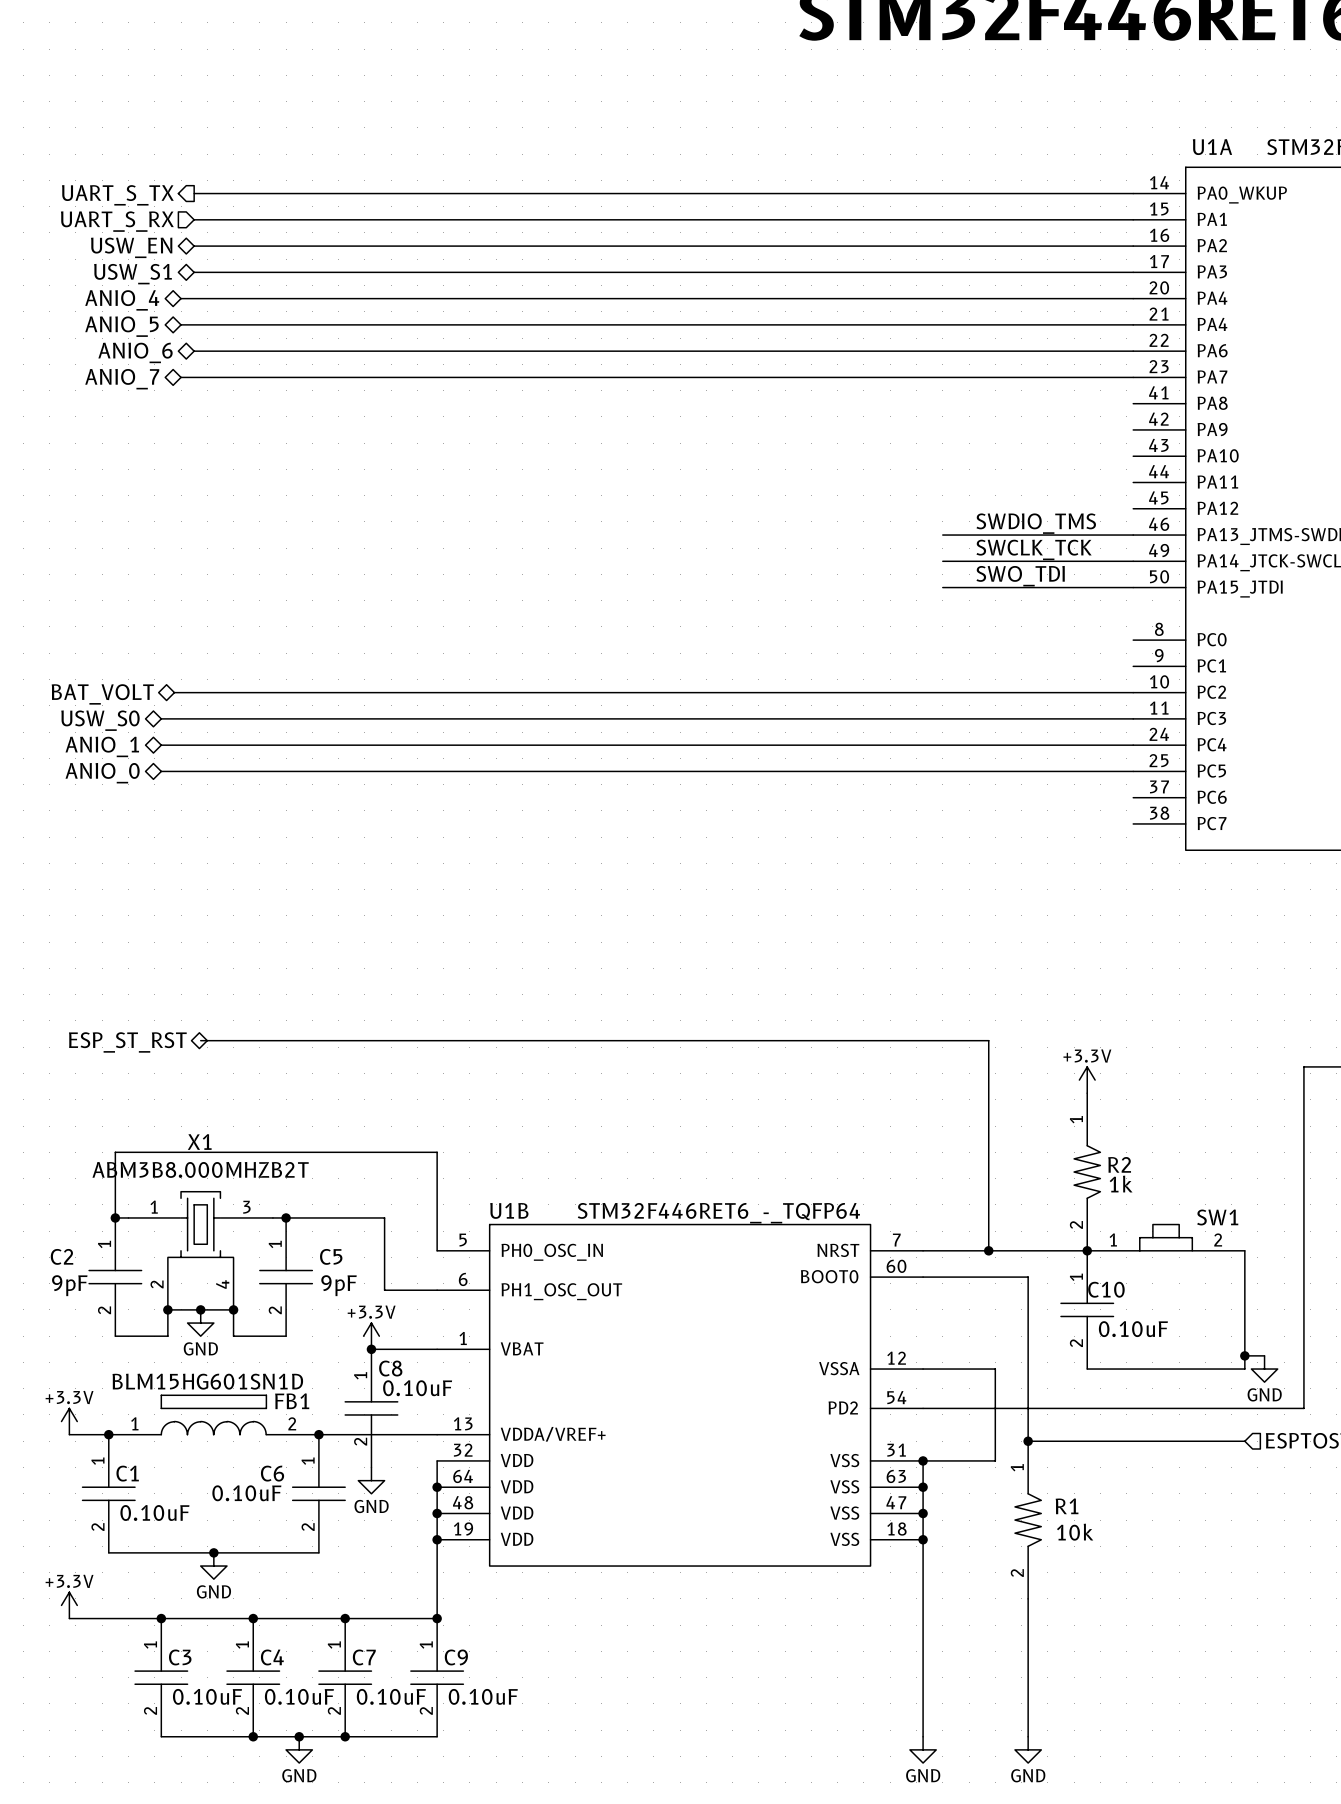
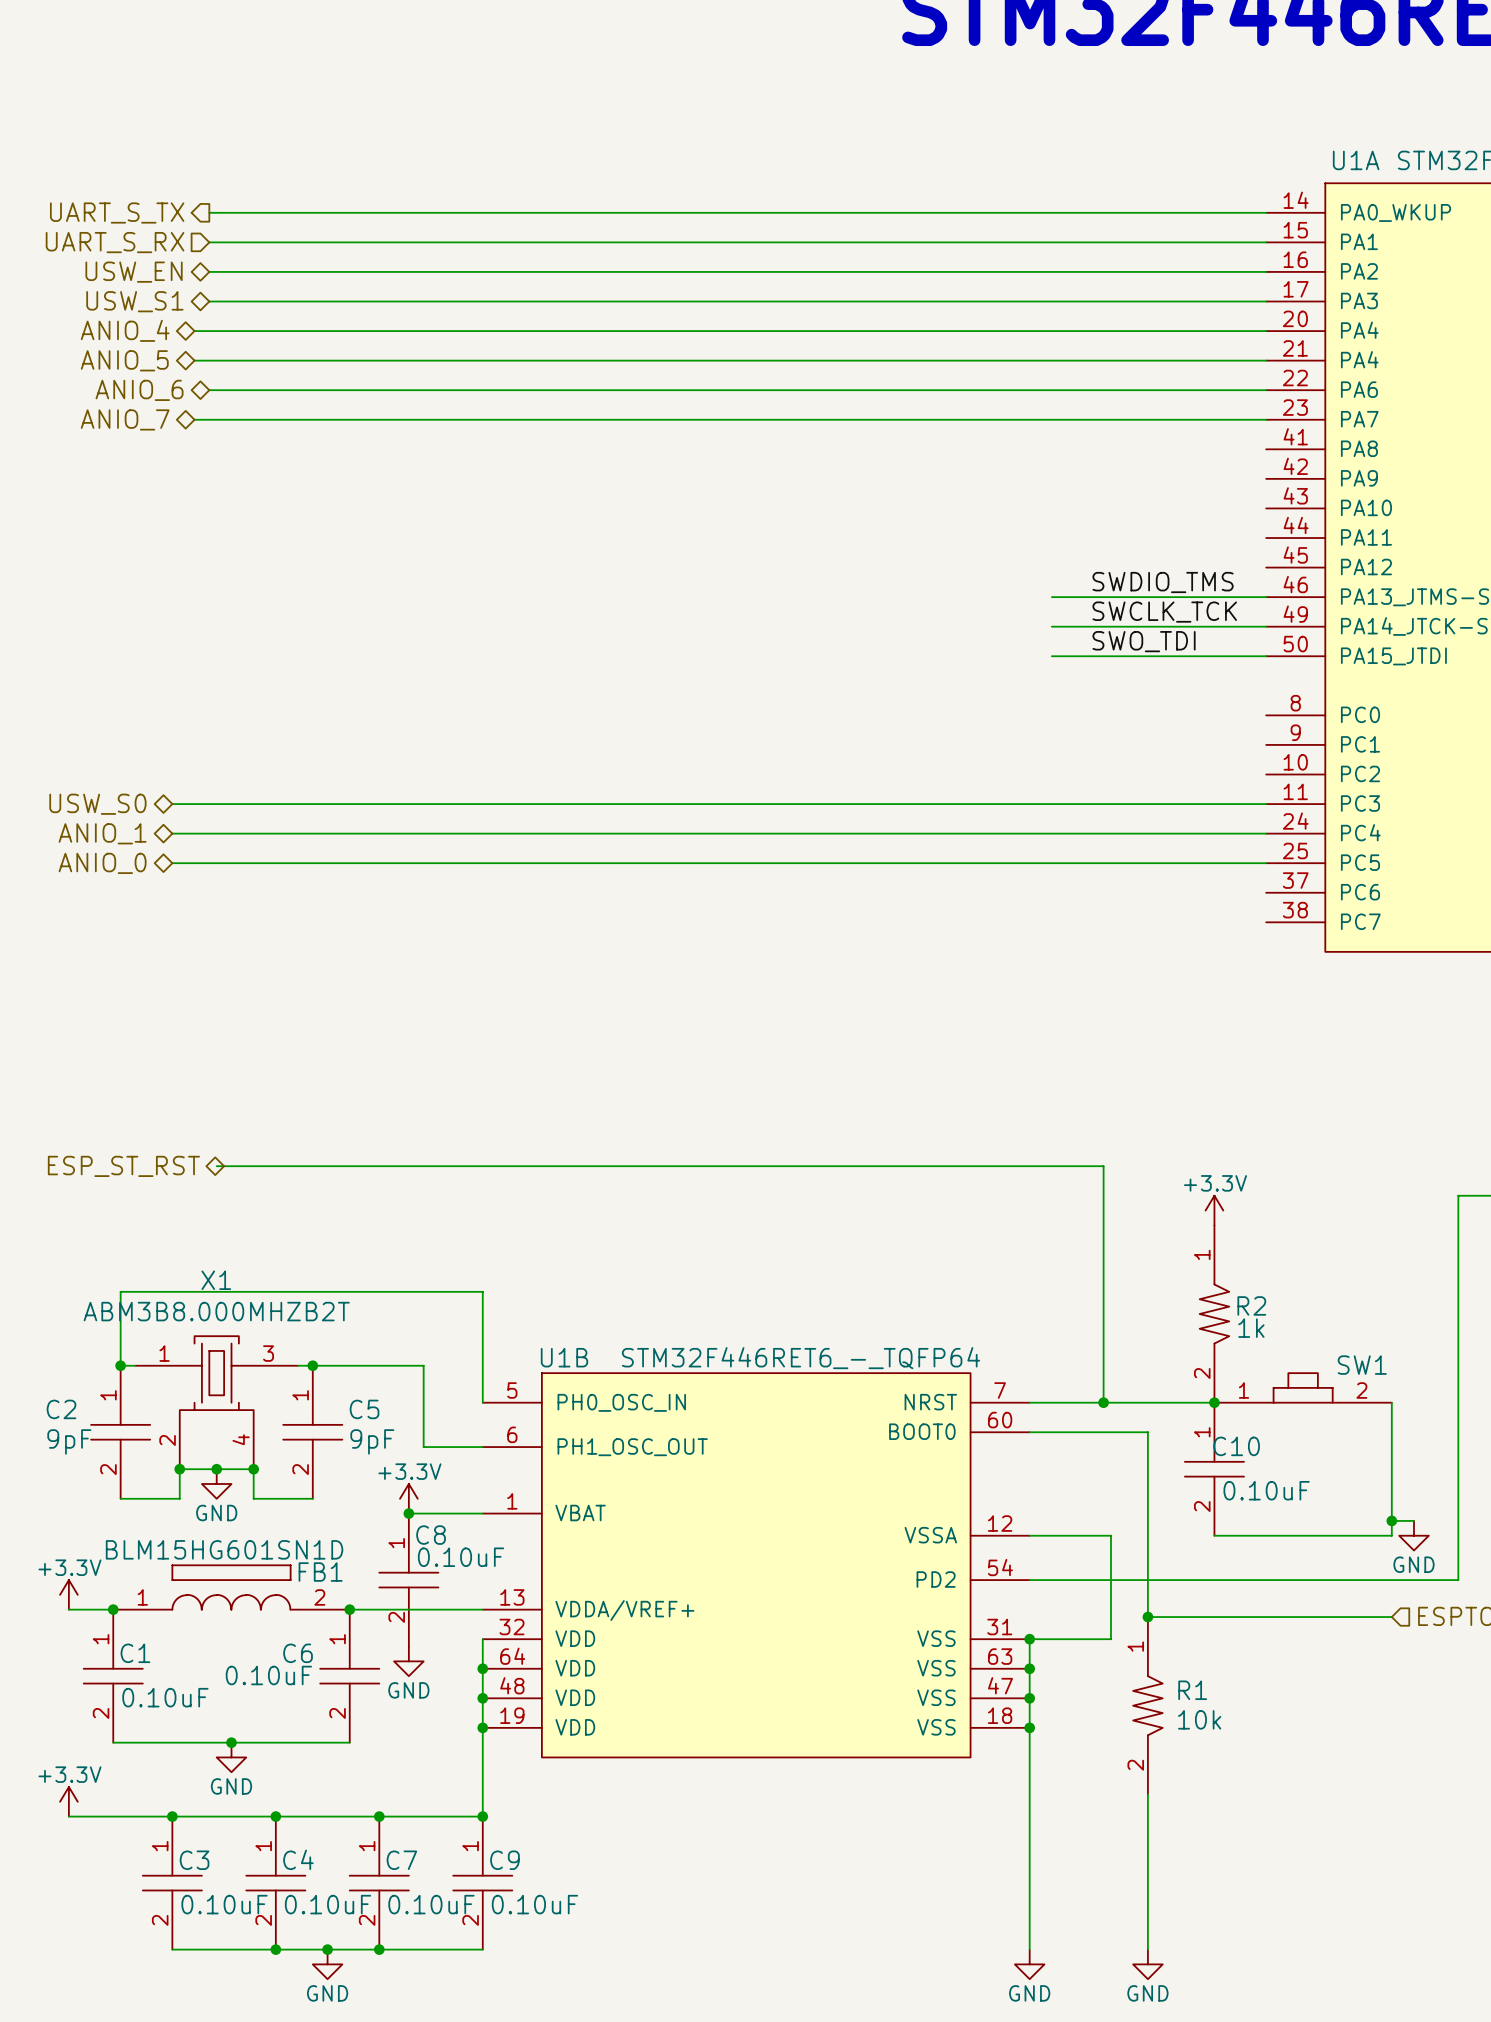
wire: (174, 692) (1133, 692) -> none
hierarchical label: BAT_VOLT (102, 694) -> none

